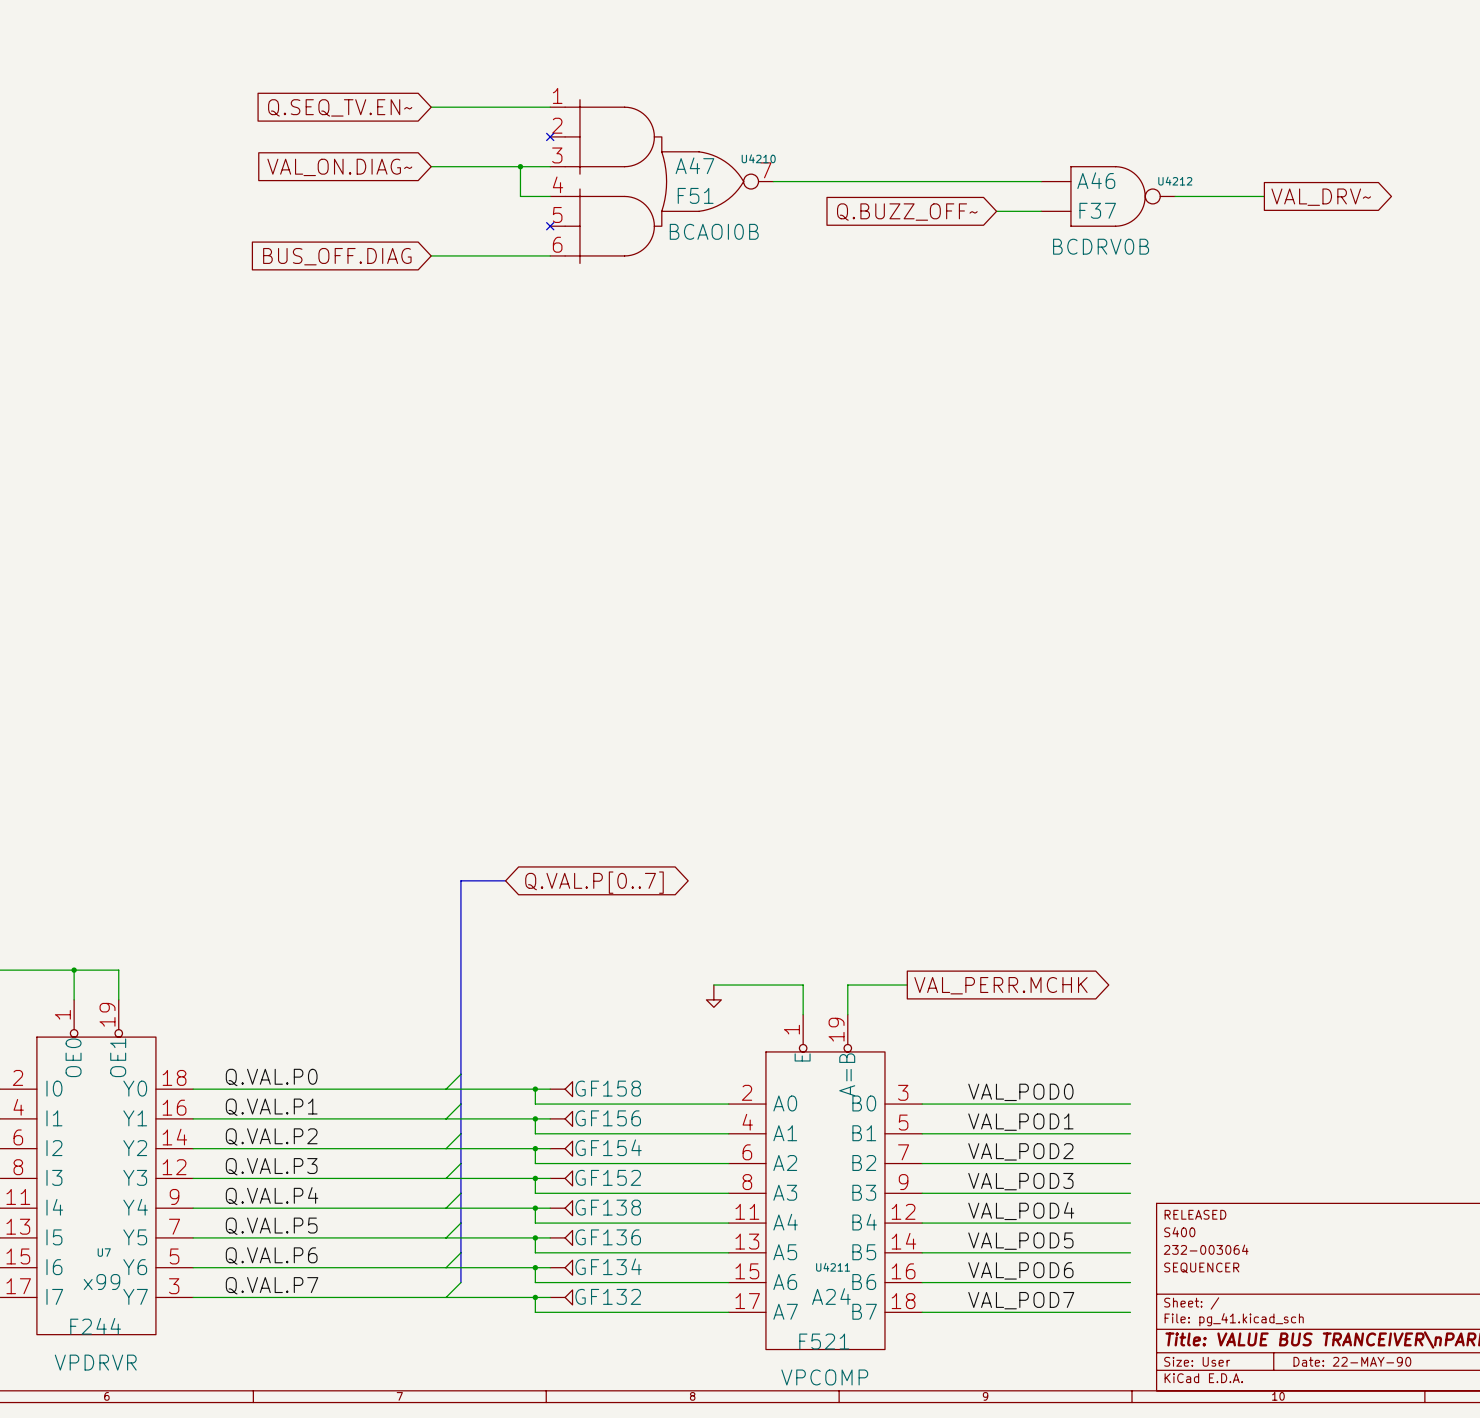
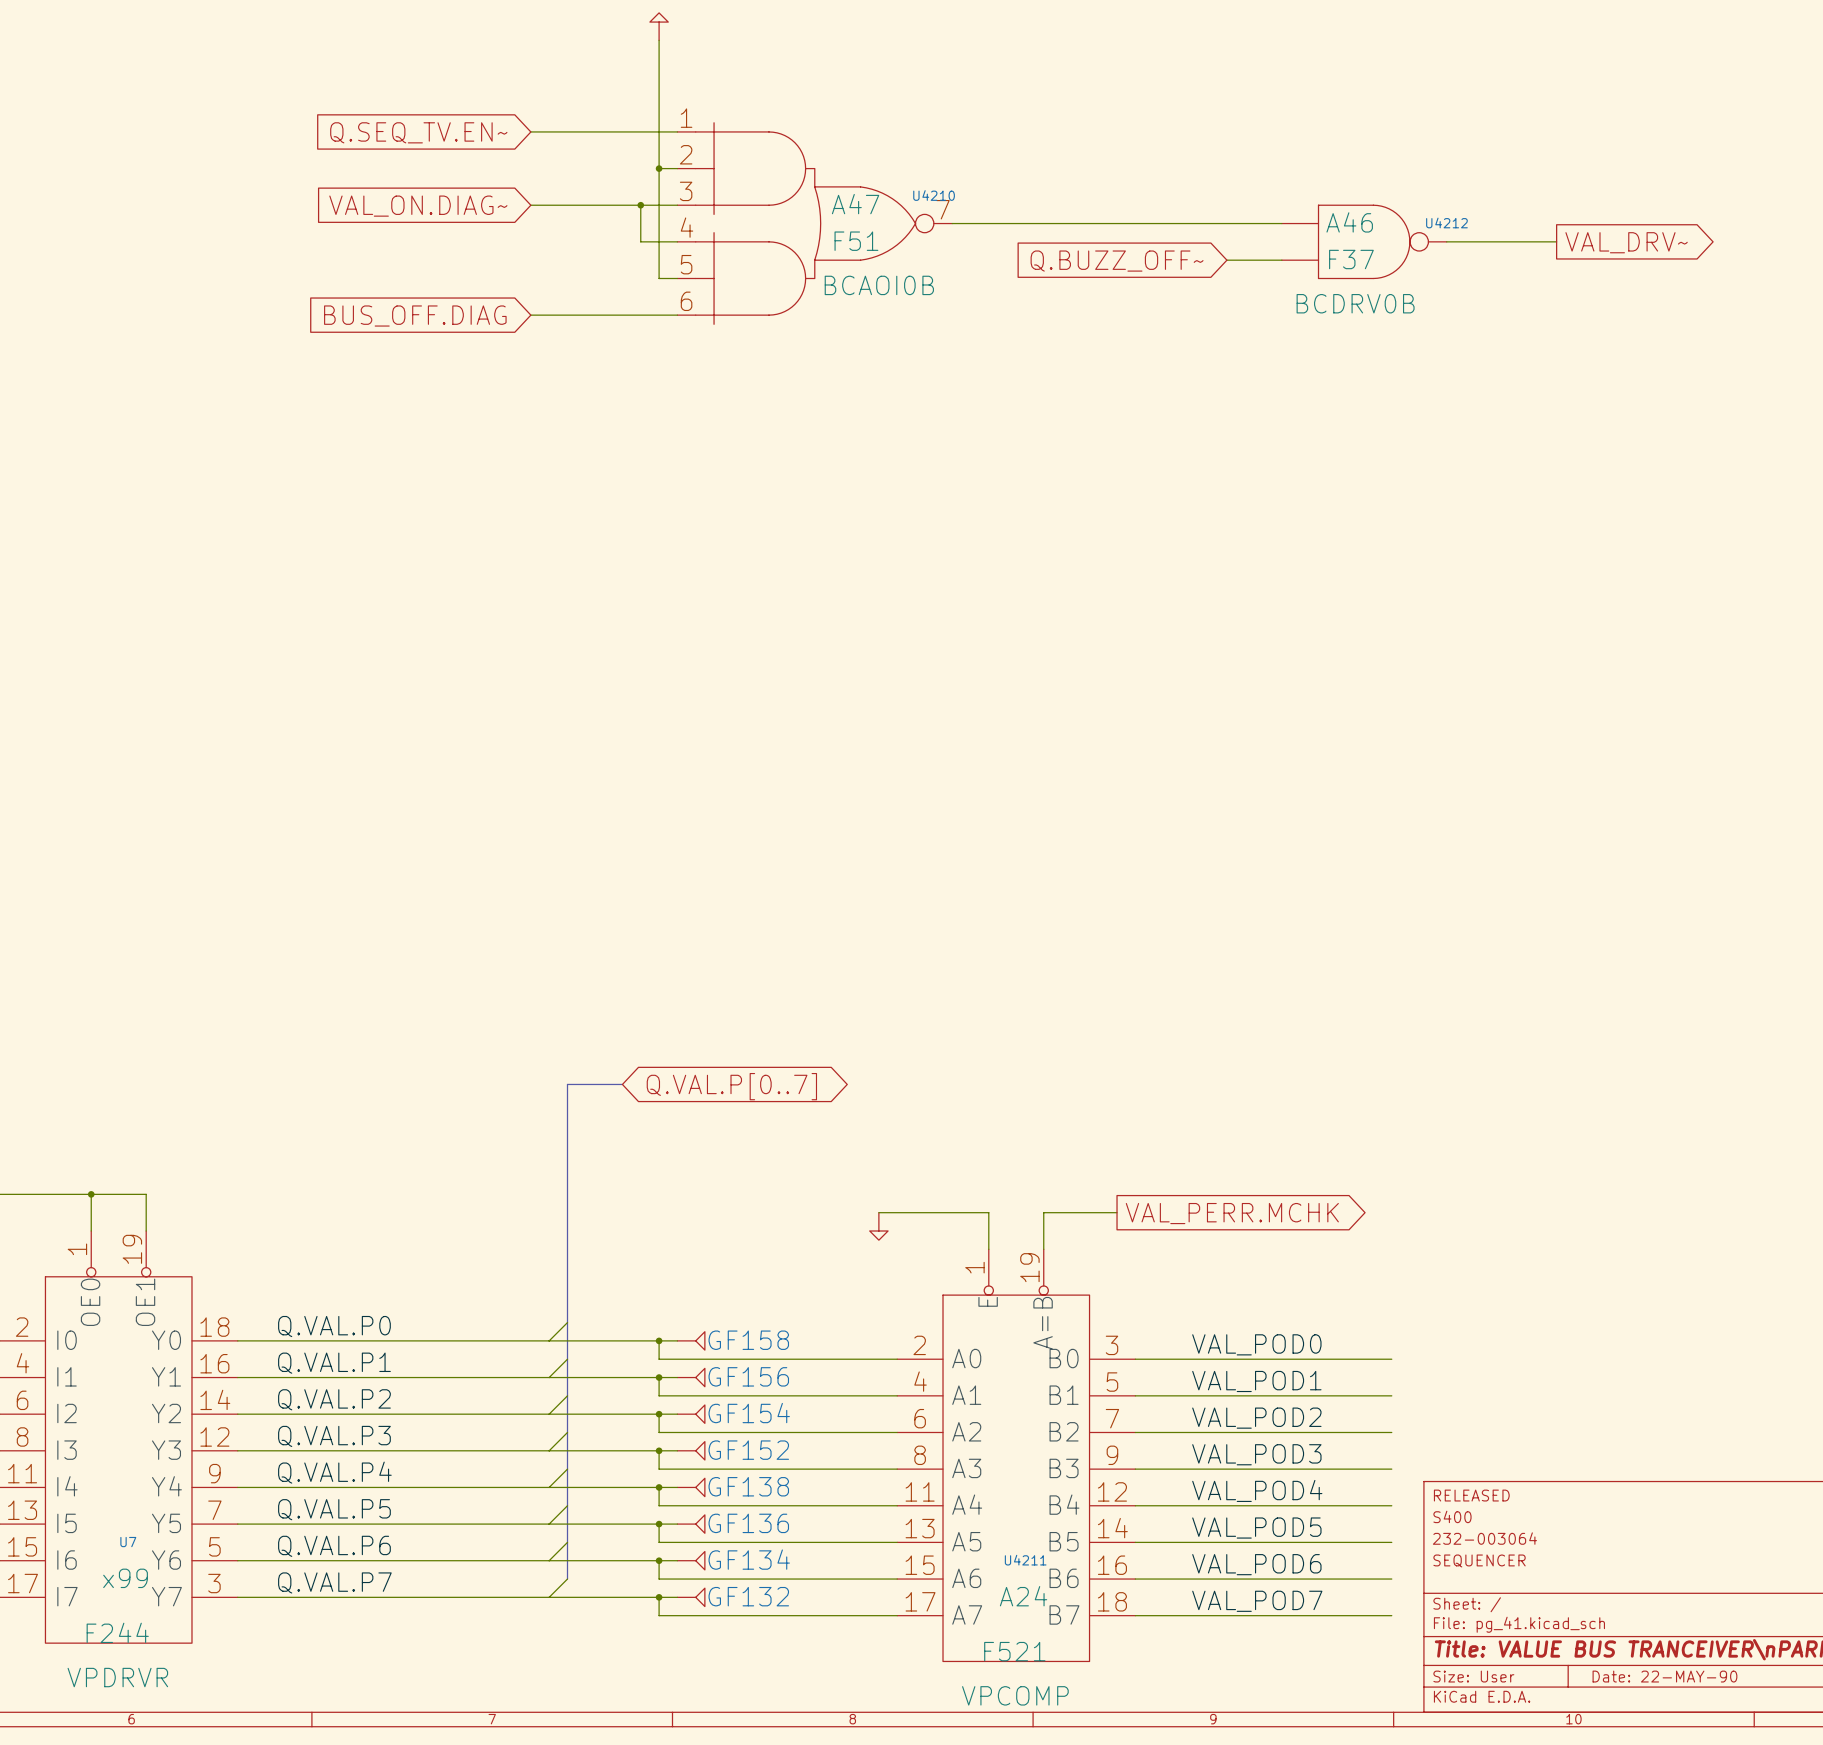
power symbol: none -> (659, 26)
wire: none -> (659, 40) (659, 278) (677, 278)
wire: none -> (659, 168) (677, 168)
junction: none -> (659, 168)
no-connect mark: (550, 136) -> none
no-connect mark: (550, 226) -> none

